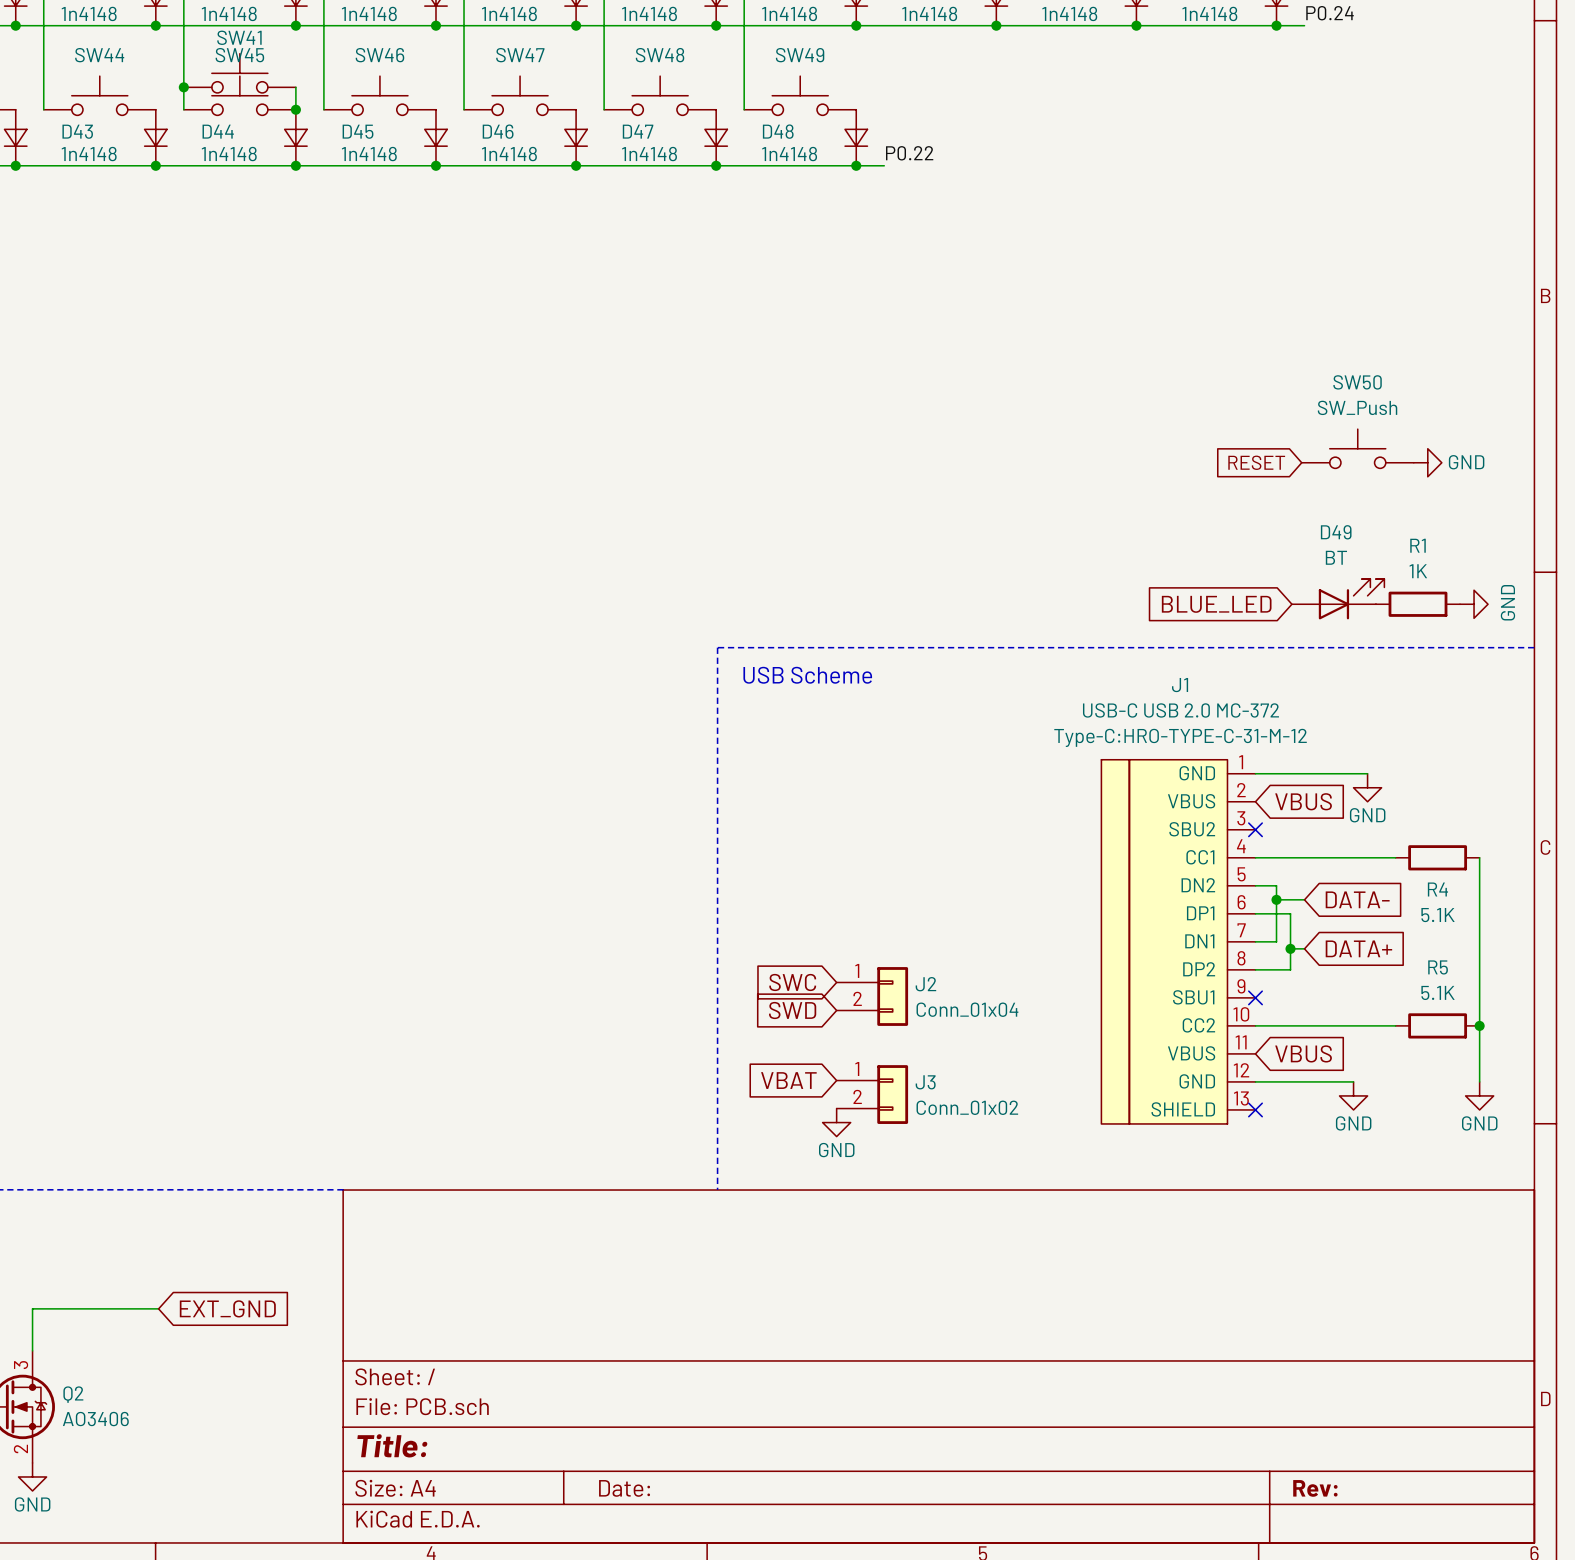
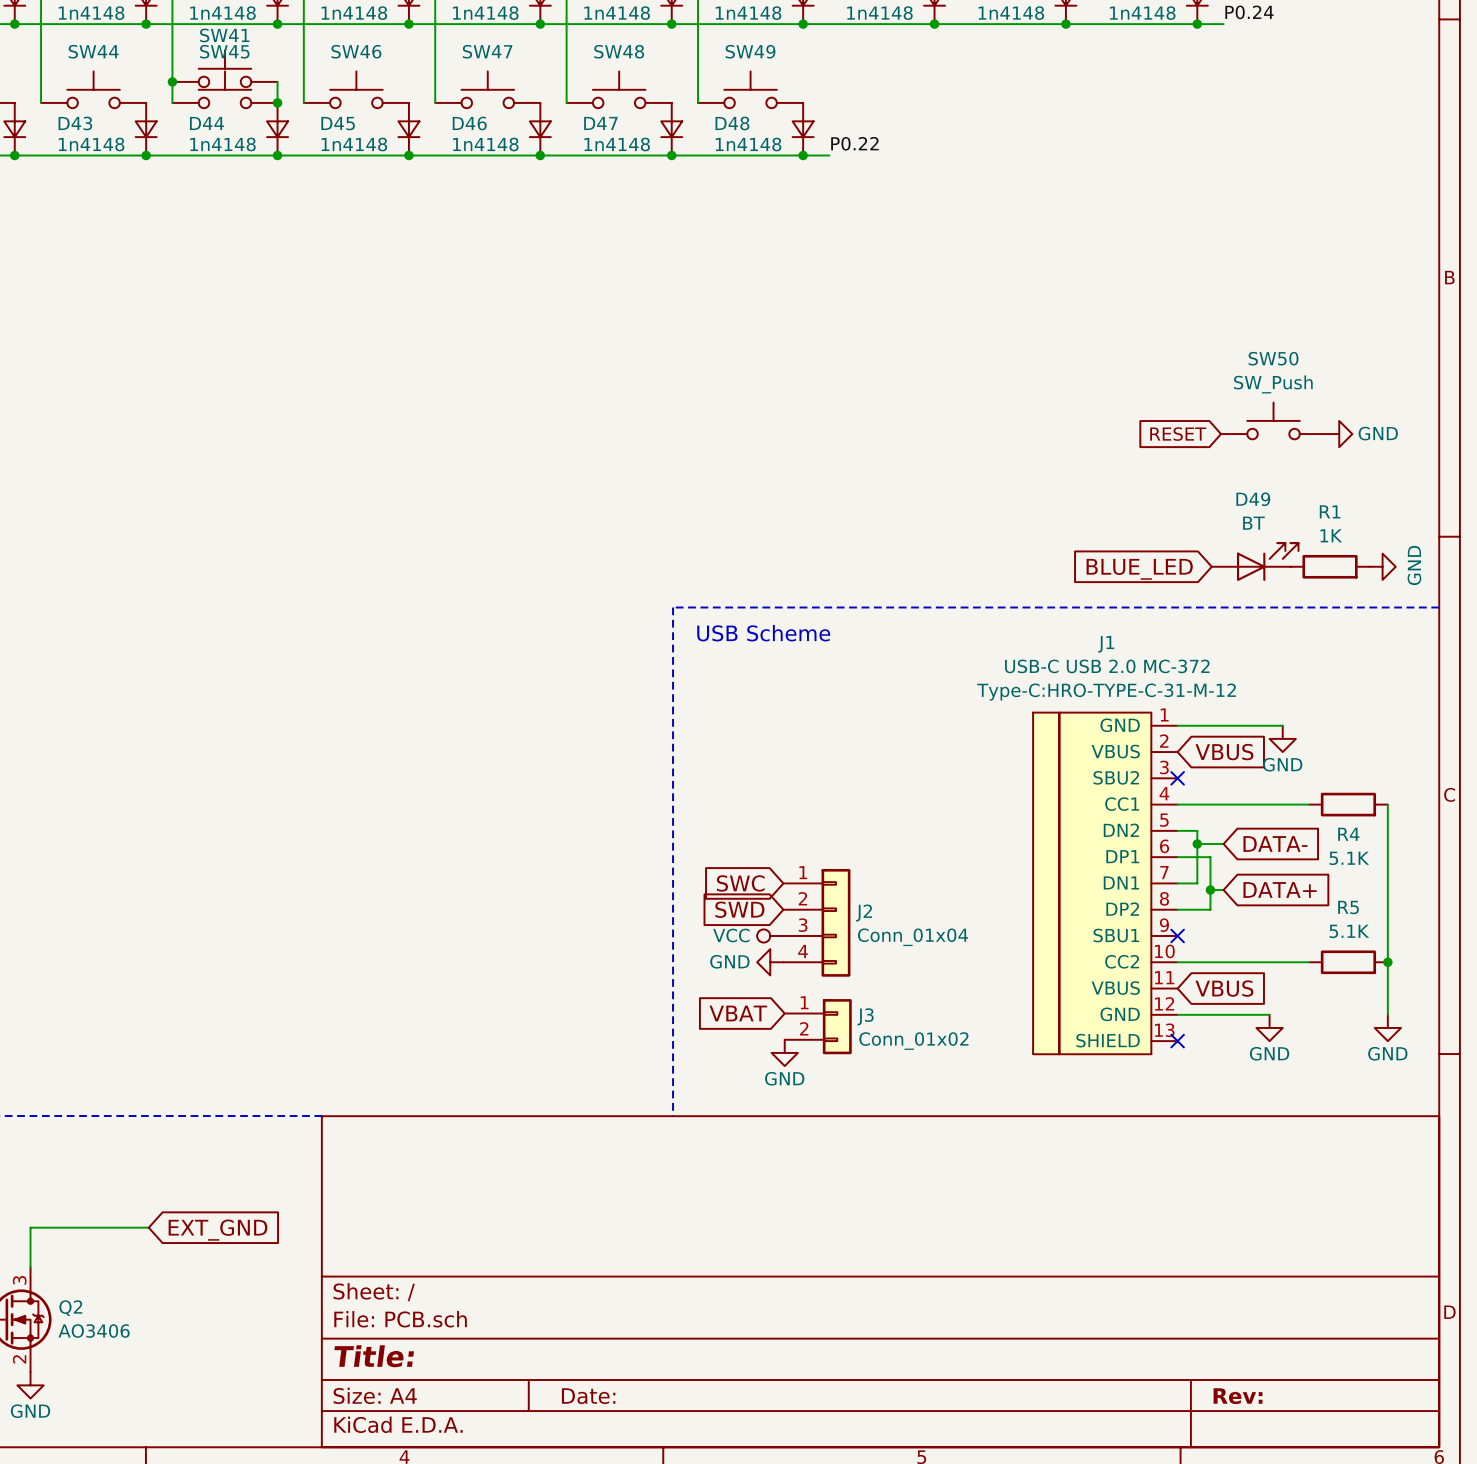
J2 symbol: [836, 967, 909, 1026] -> [783, 868, 851, 977]
global label position: SWC (792, 982) -> SWC (740, 883)
power symbol: none -> VCC (770, 935)
global label position: SWD (792, 1010) -> SWD (739, 909)
power symbol: none -> GND (770, 962)

